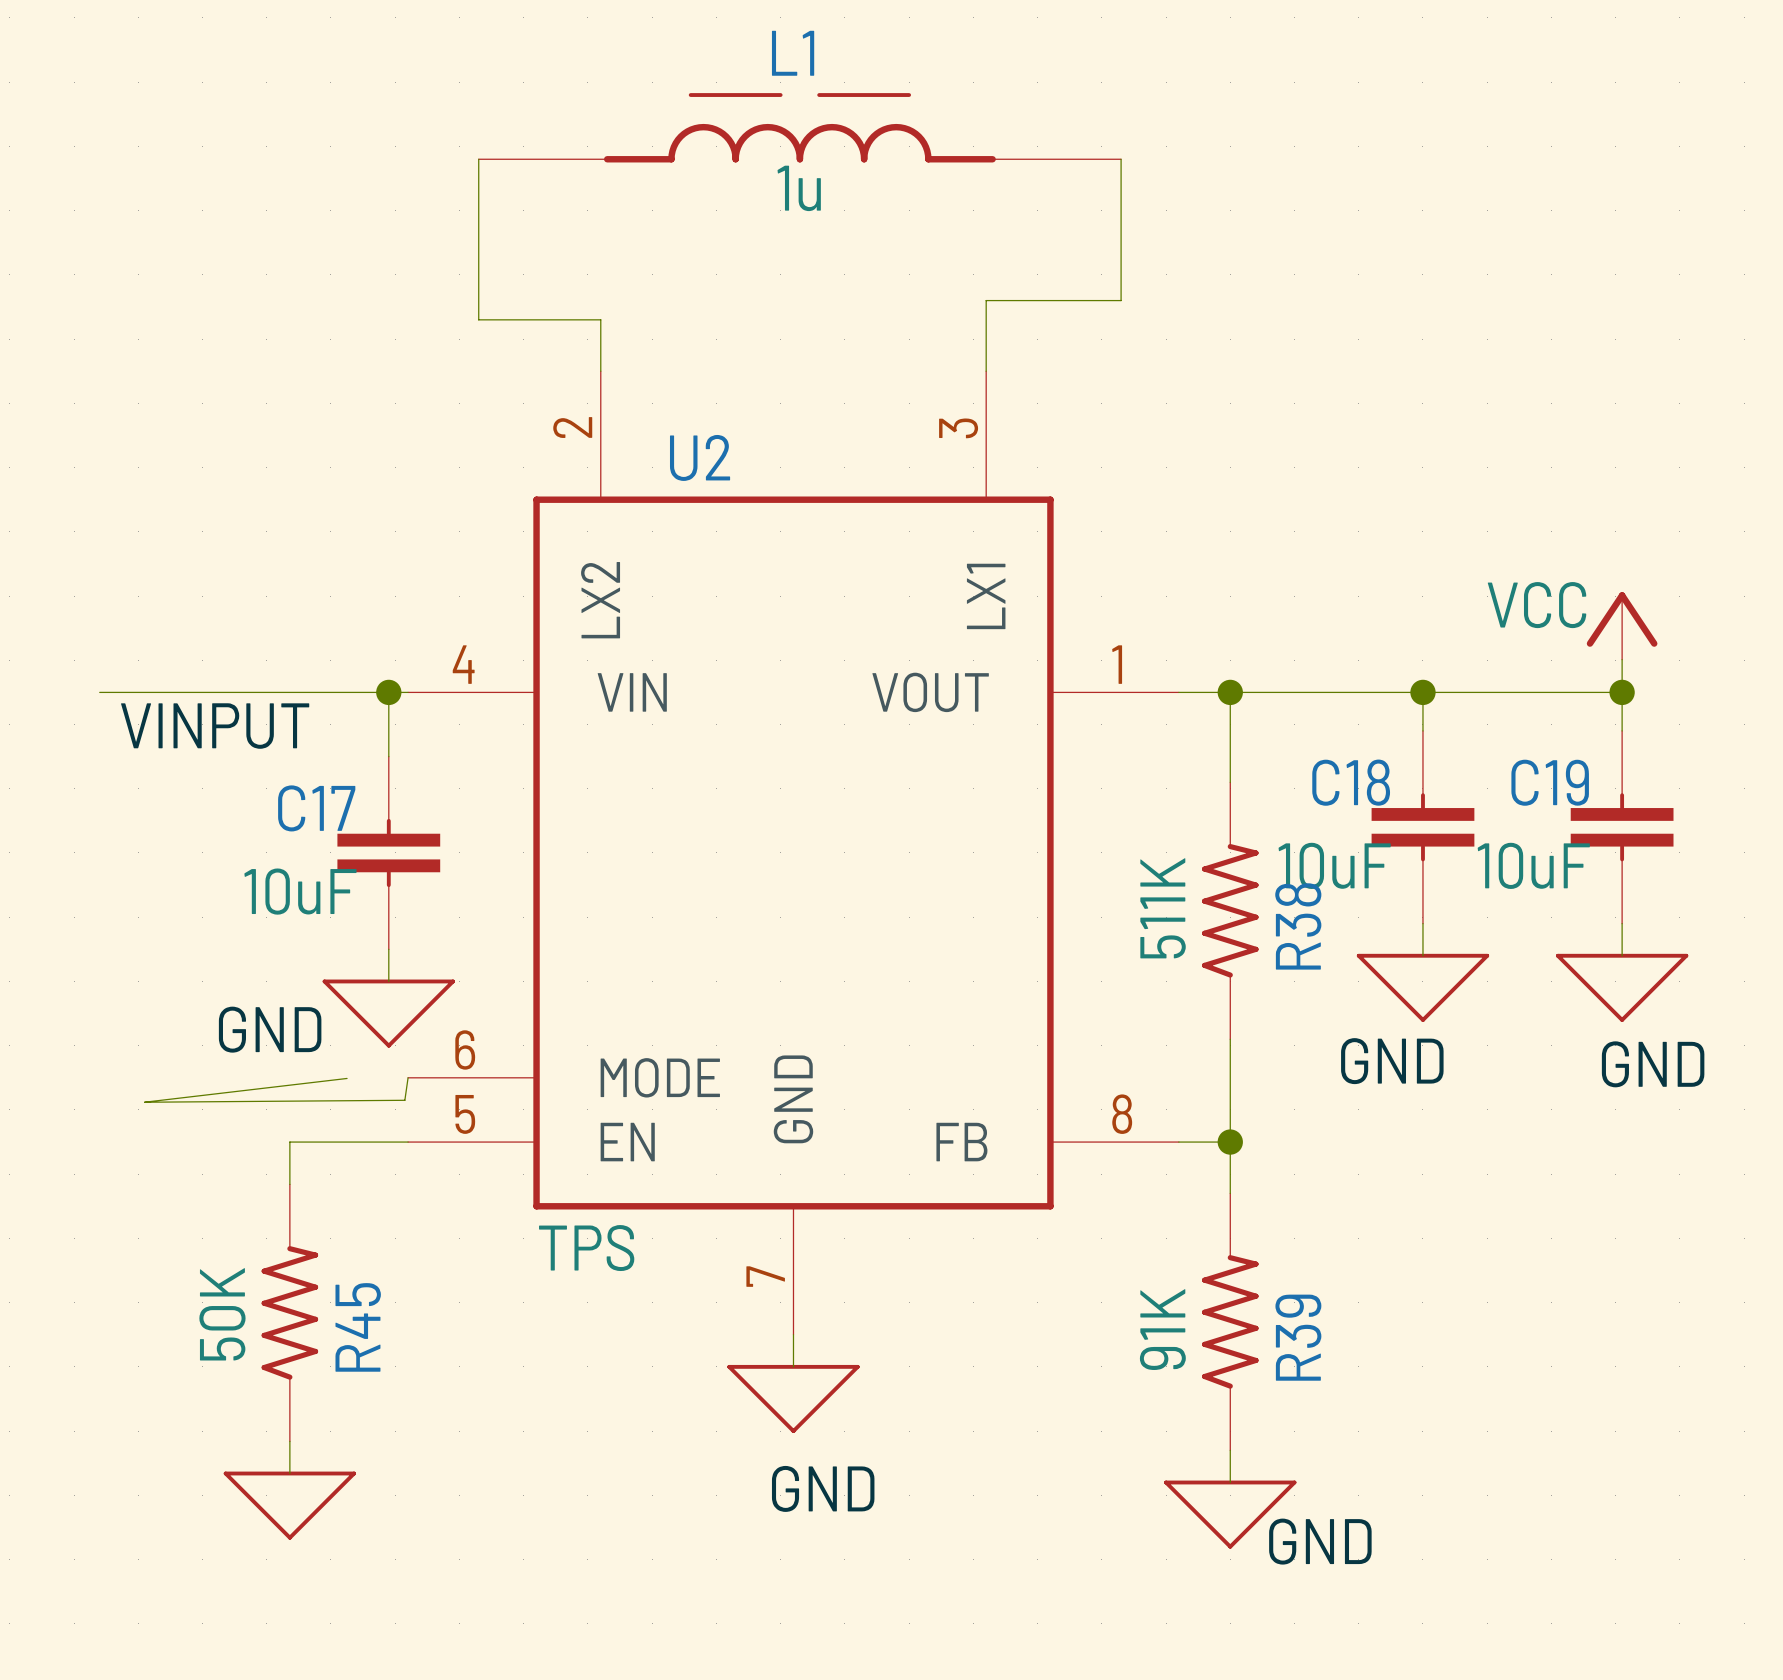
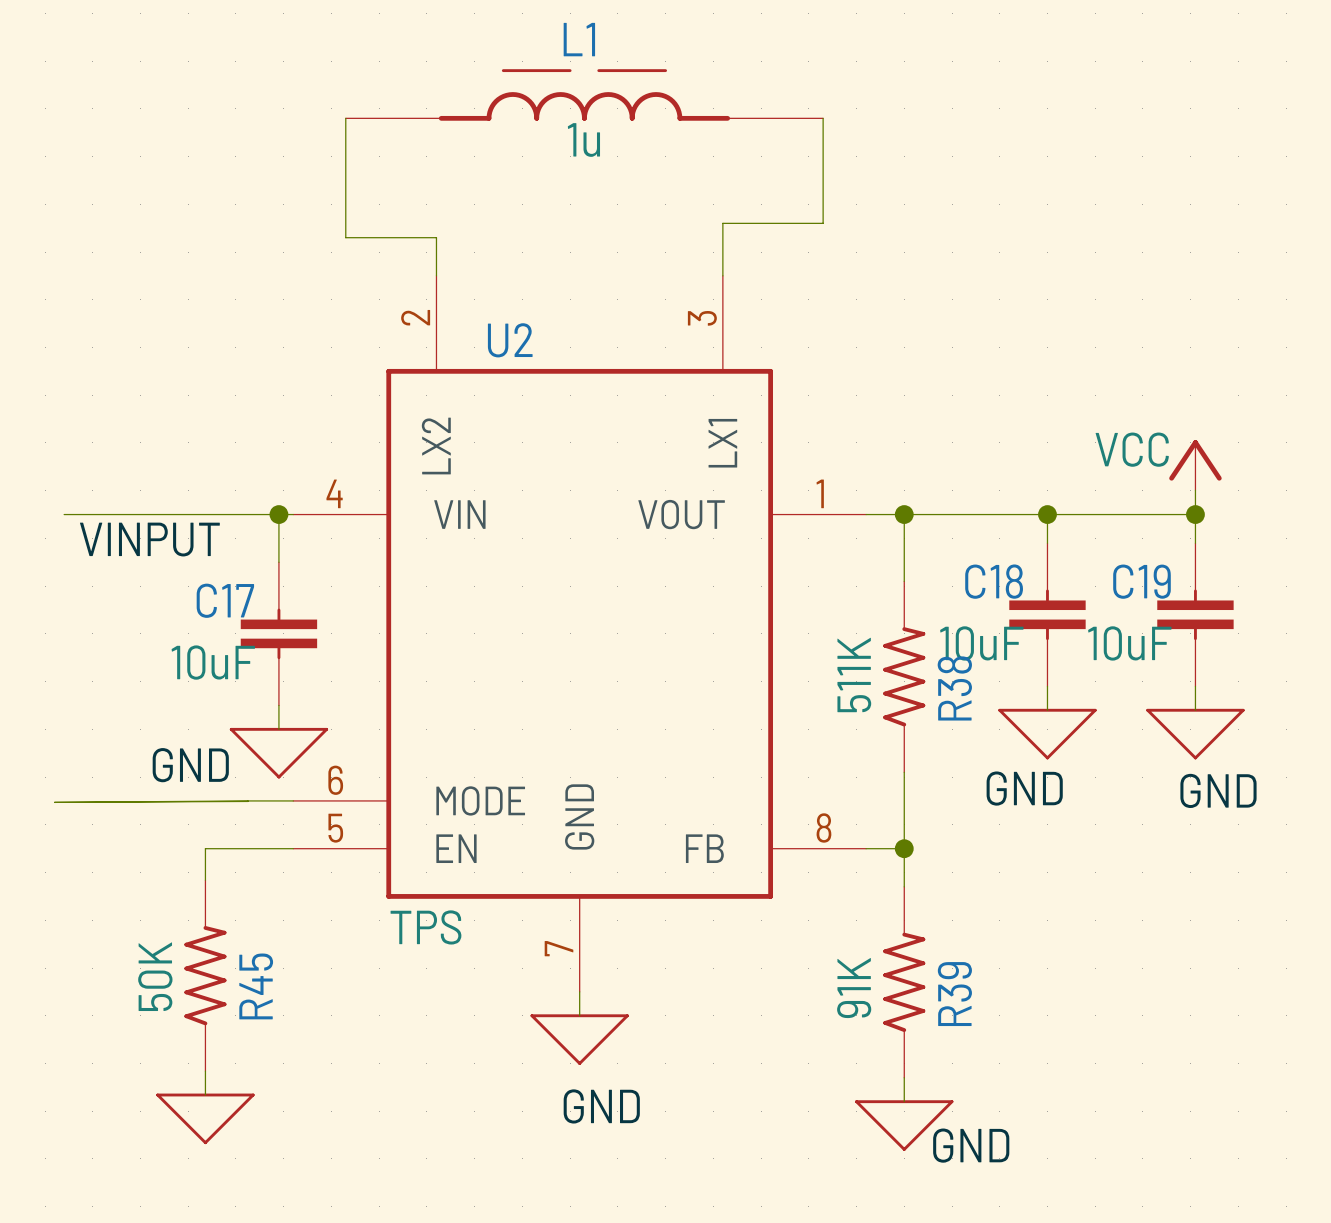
wire: (408, 1077) (404, 1100) (144, 1102) (347, 1078) -> (293, 800) (54, 802) (247, 801)

